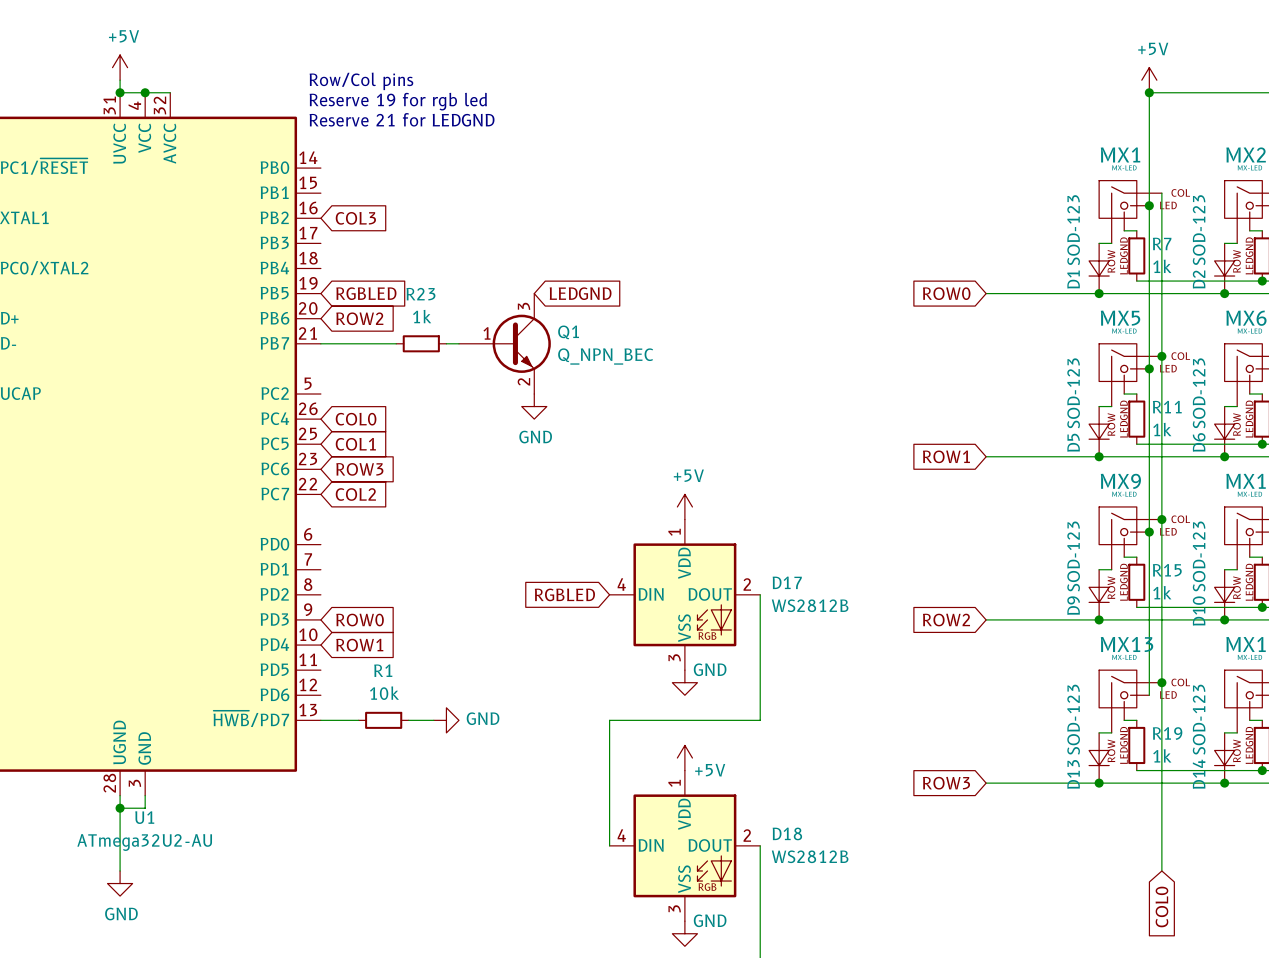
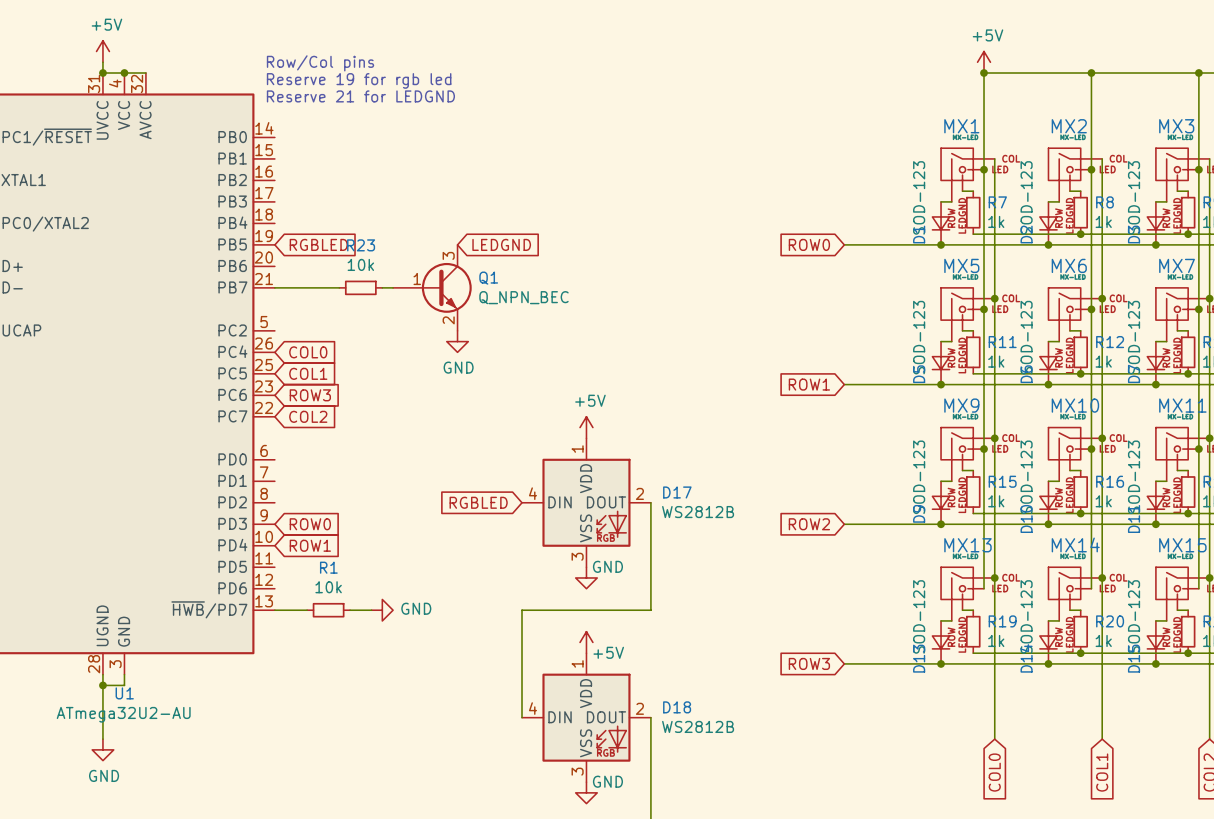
global label: COL3 (355, 218) -> none
R23 value: 1k (422, 316) -> 10k (360, 264)
global label: ROW2 (359, 318) -> none

